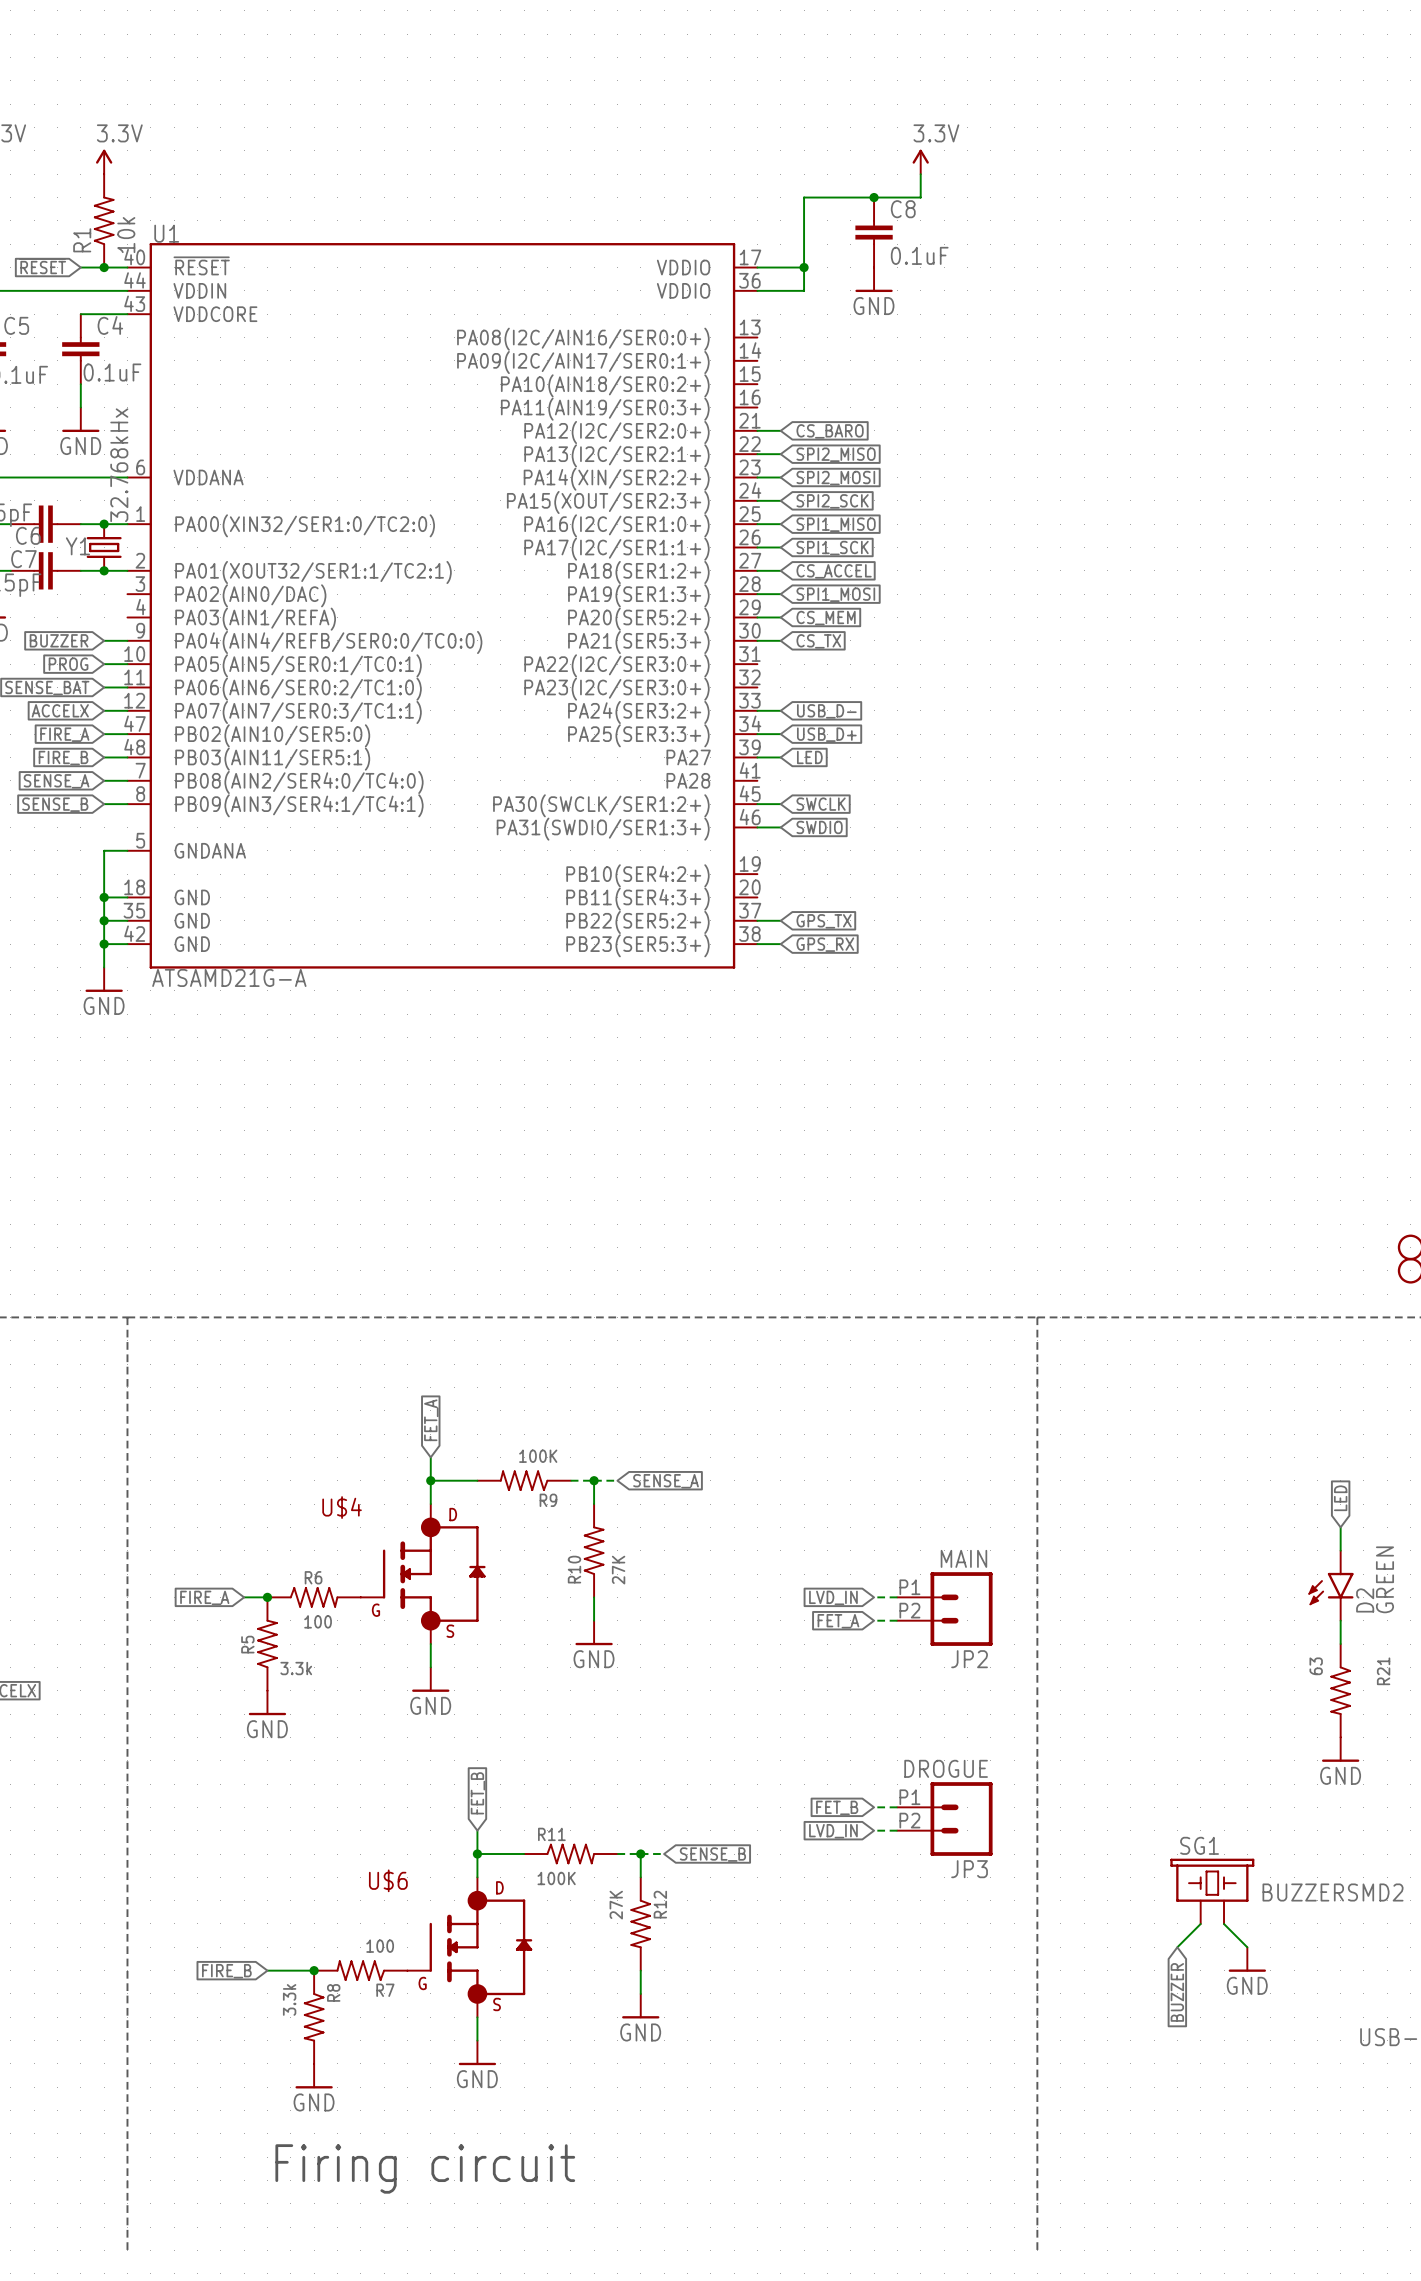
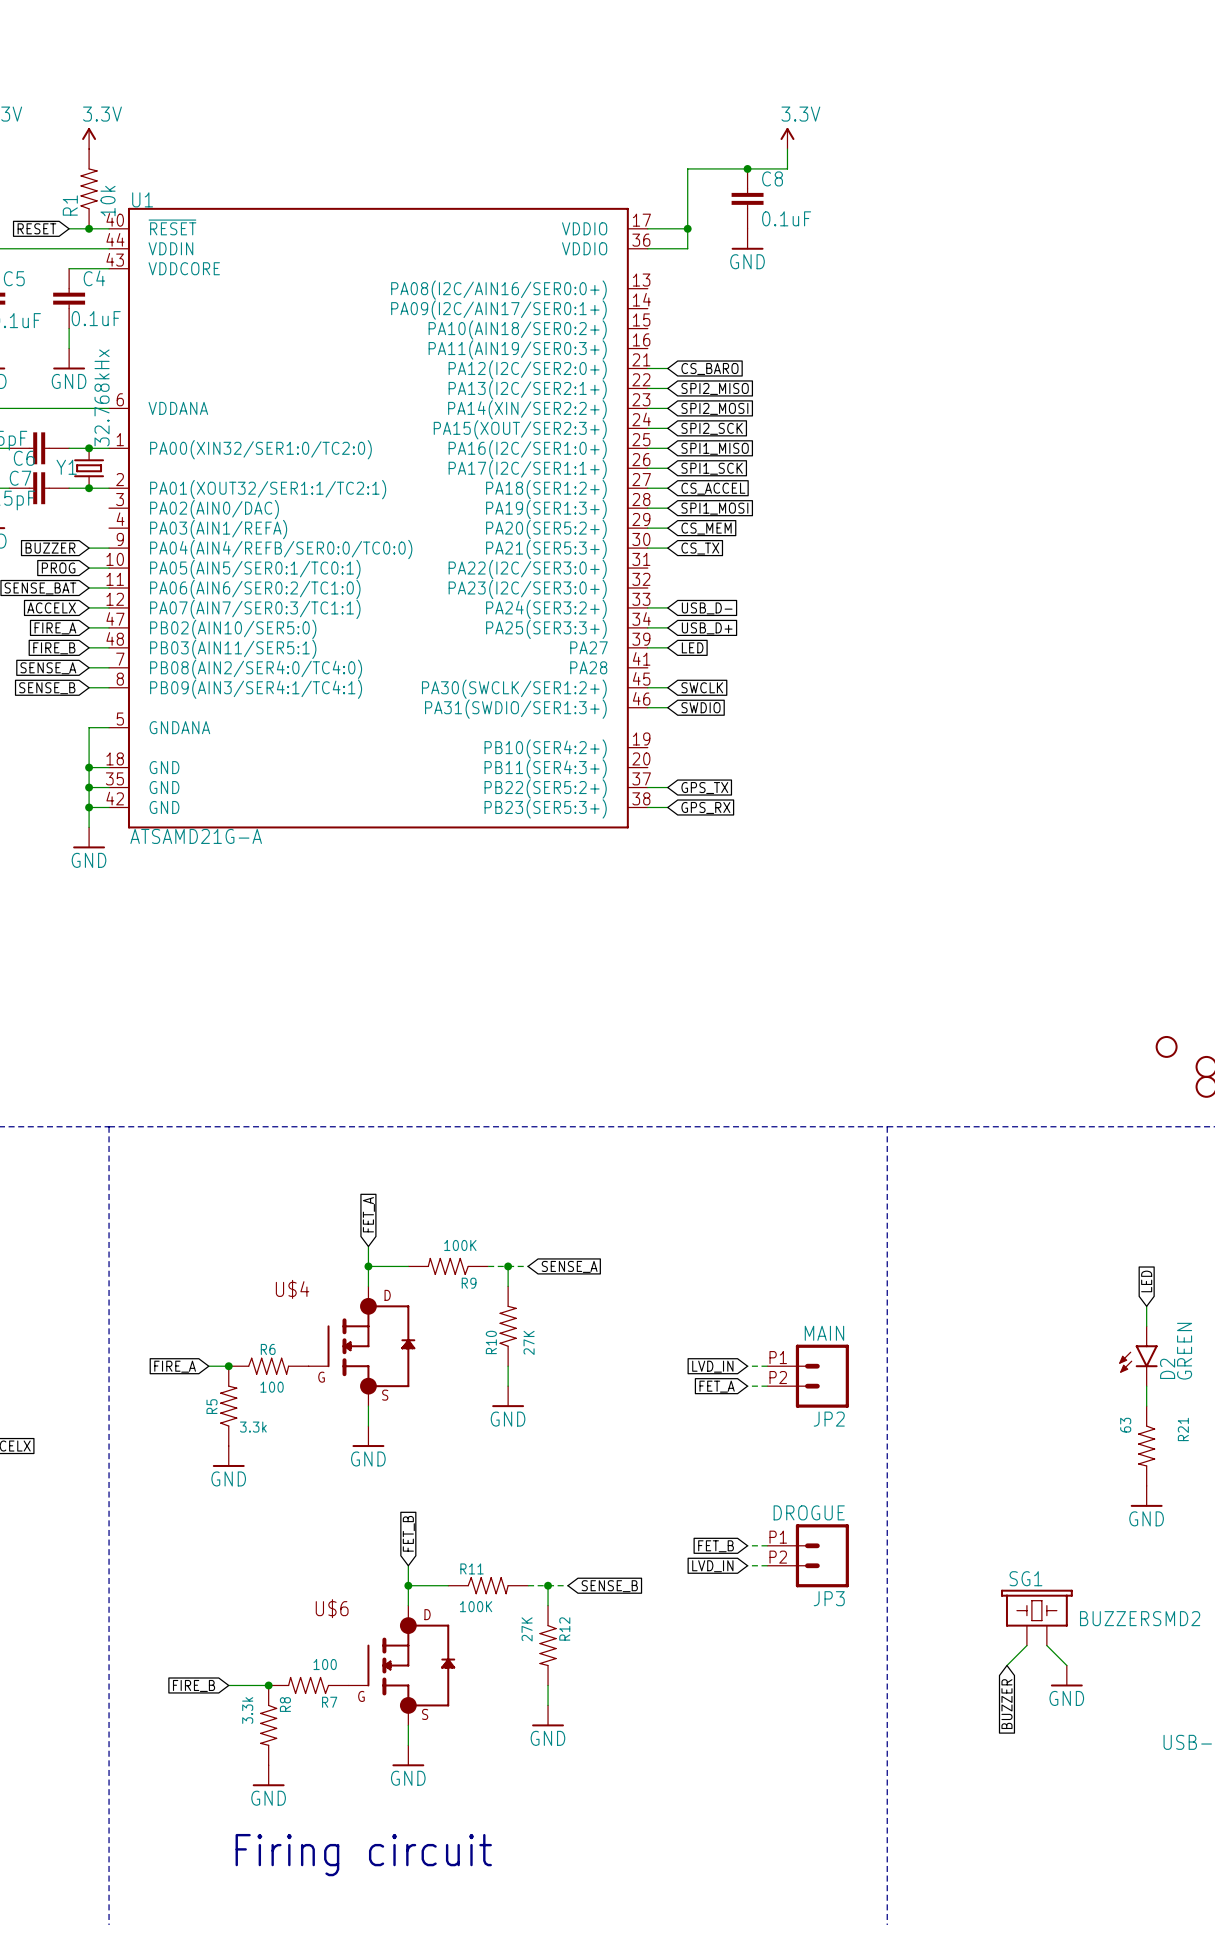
part: none -> (1166, 1046)

